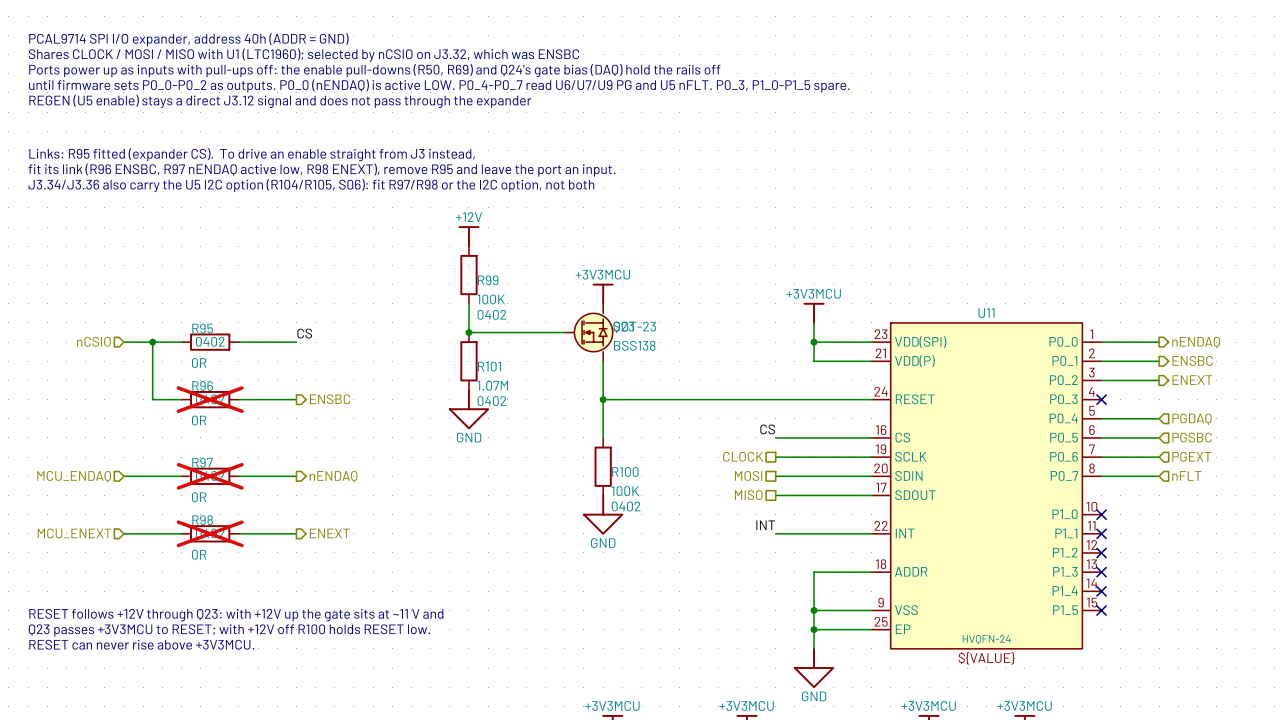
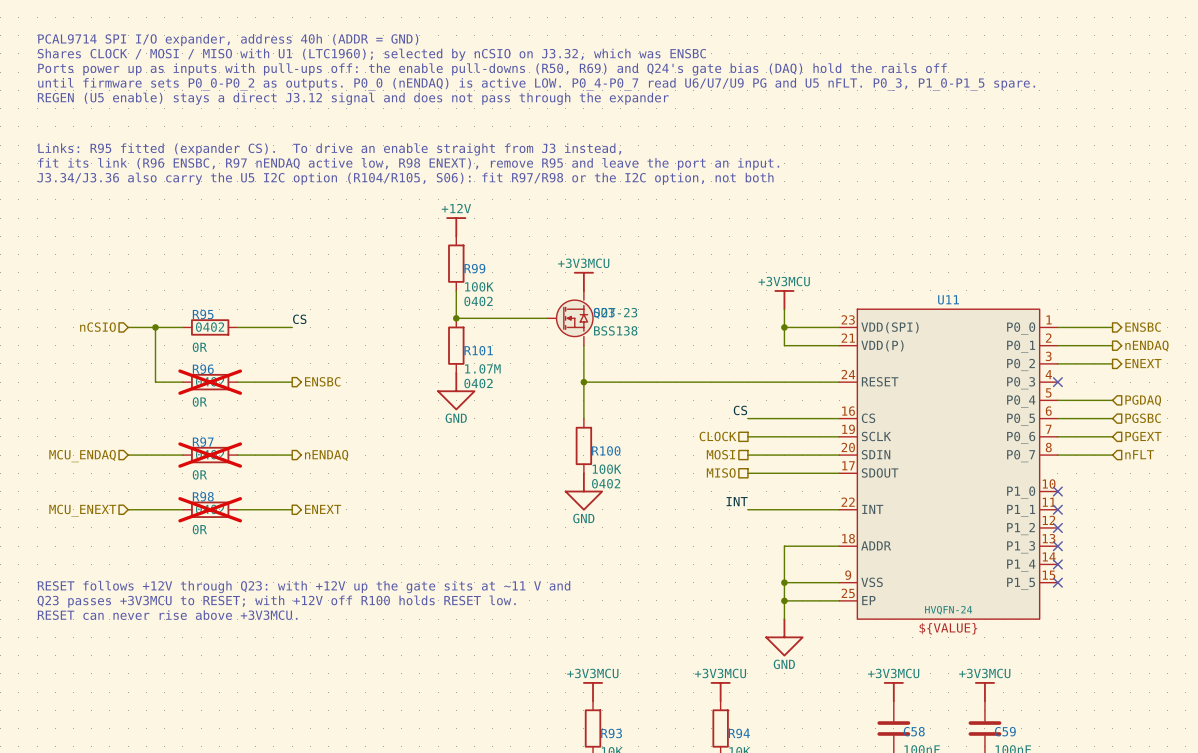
hierarchical label: nENDAQ (1196, 342) -> ENSBC (1143, 327)
hierarchical label: ENSBC (1192, 360) -> nENDAQ (1146, 346)

